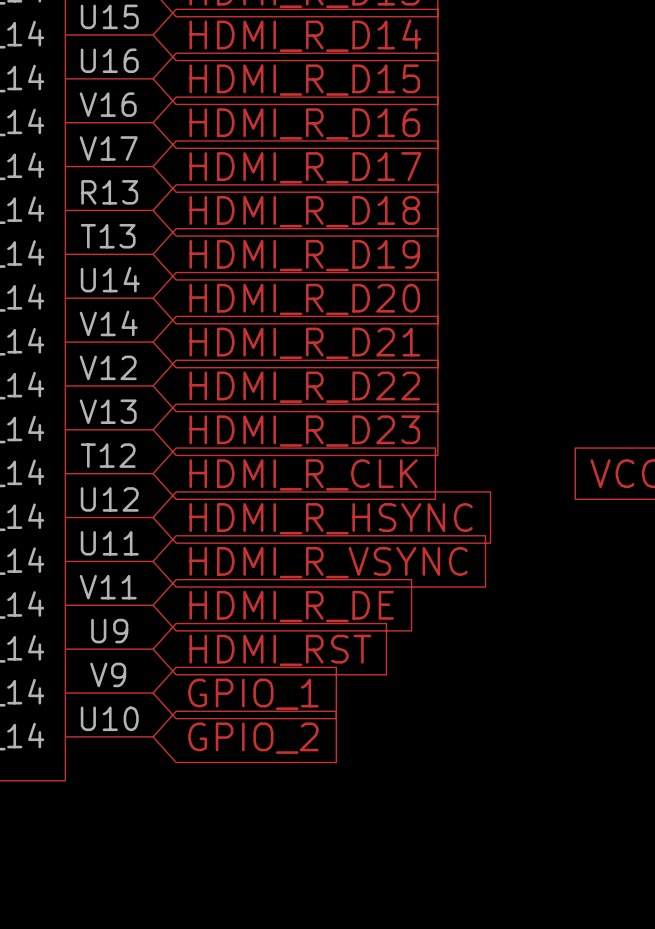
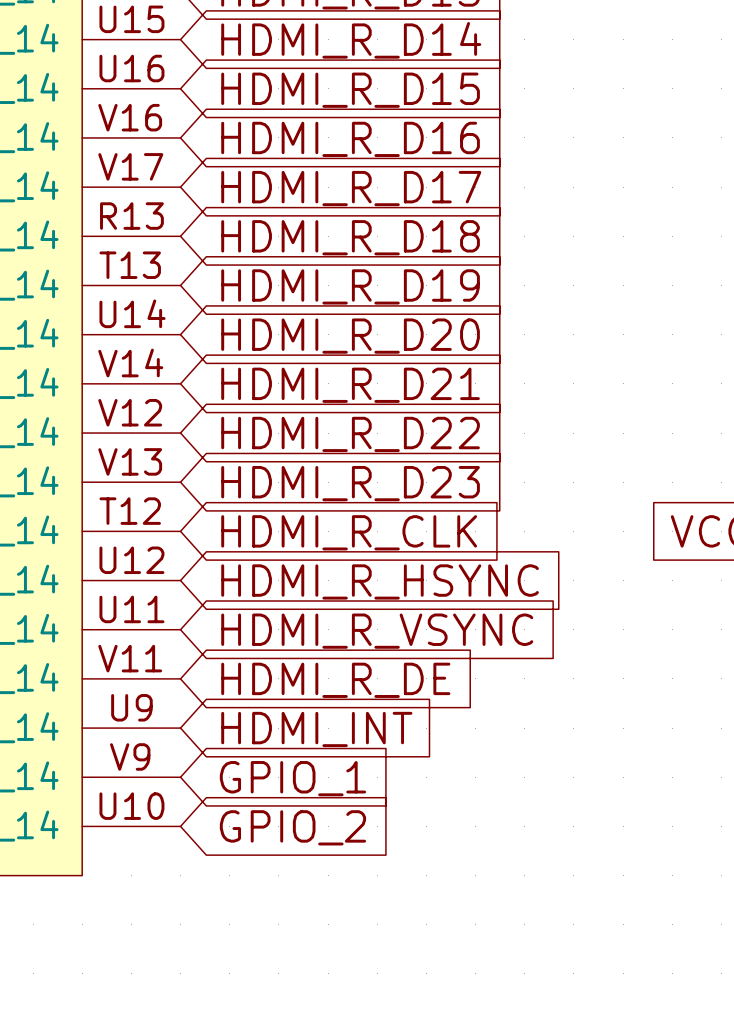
global label: HDMI_RST (280, 650) -> HDMI_INT (316, 729)

